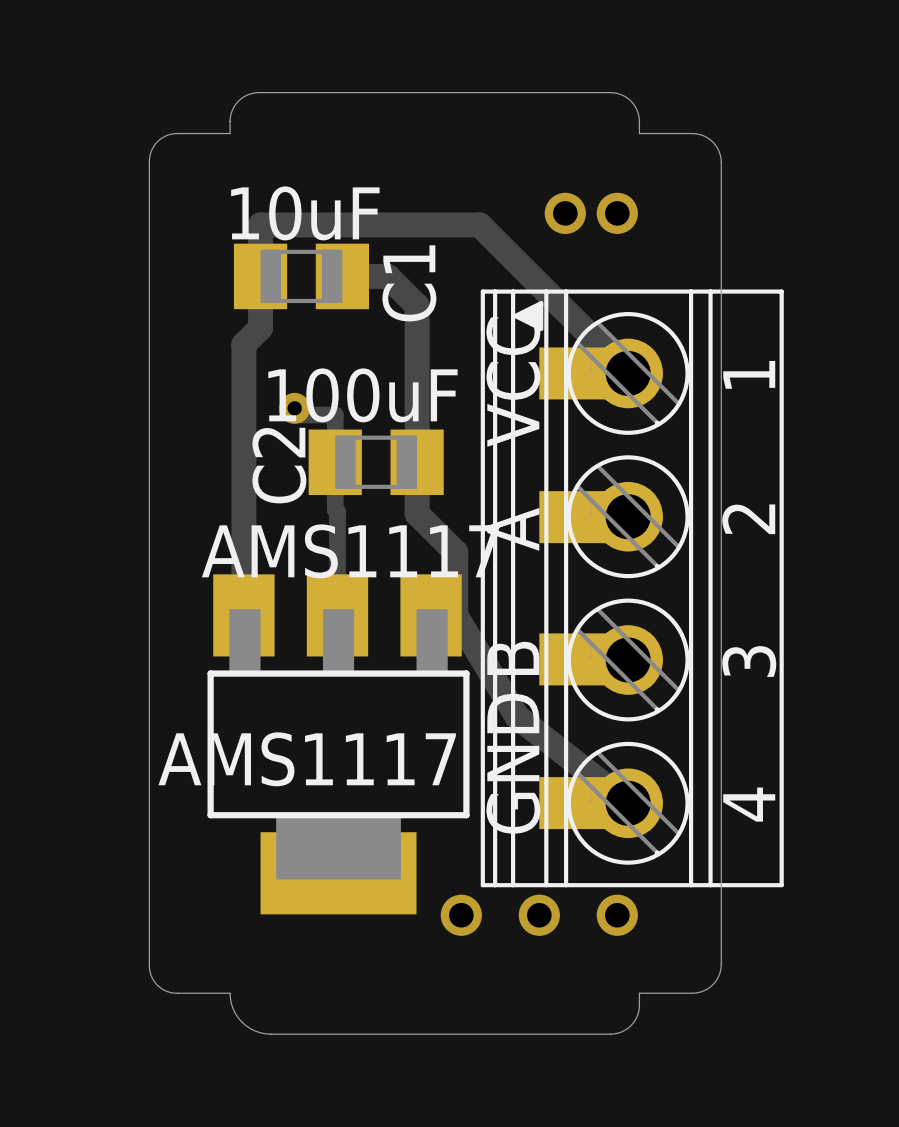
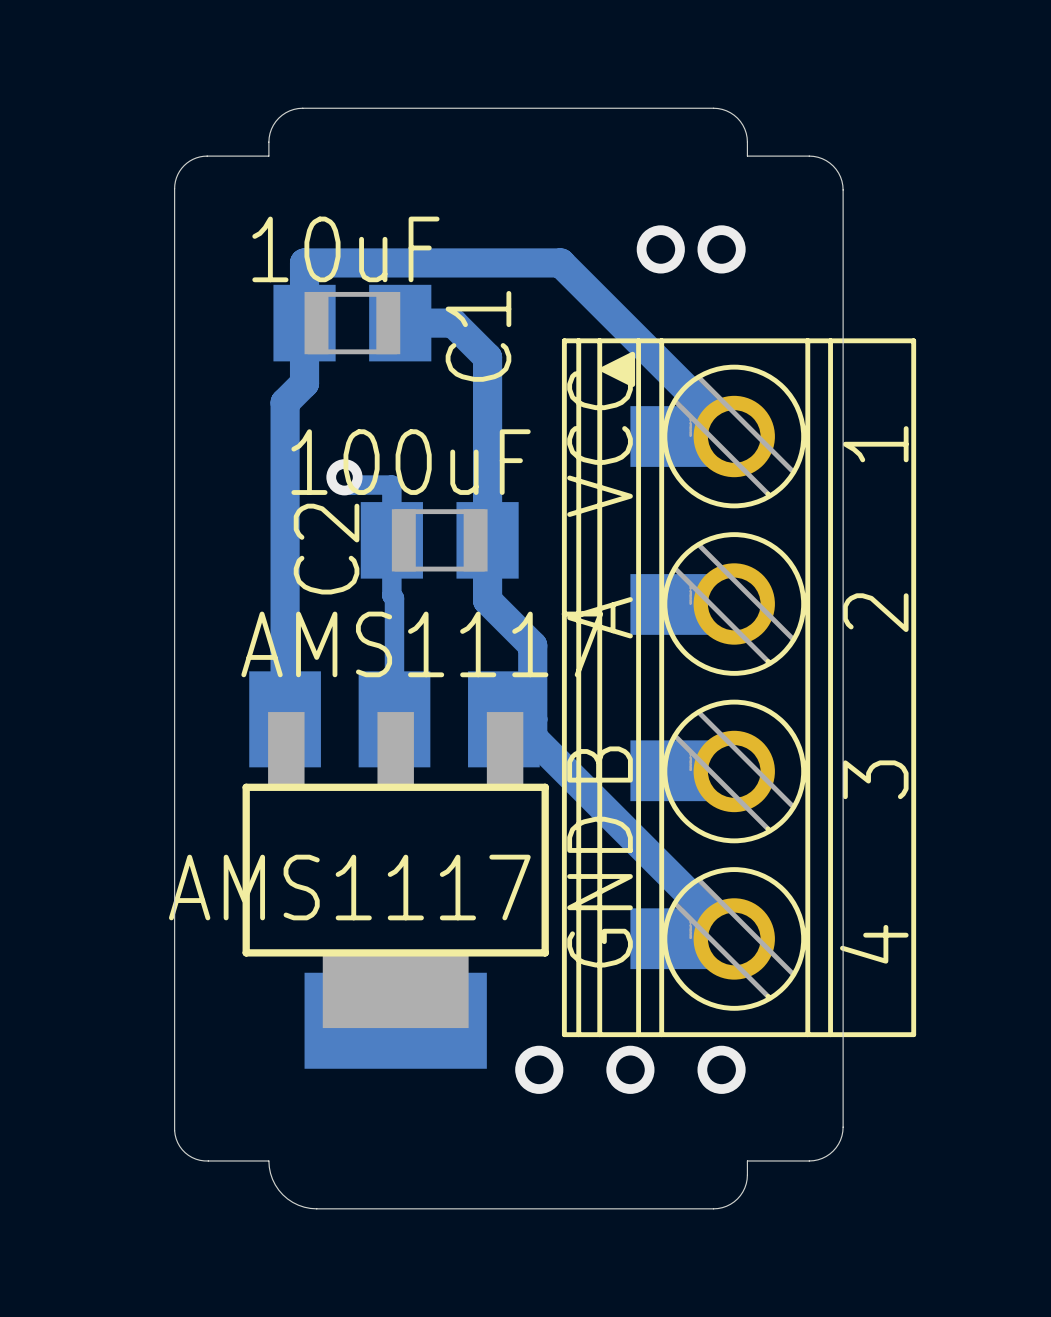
track: (455, 615) (517, 716) (628, 803) -> (532, 719) (532, 737) (734, 938)

